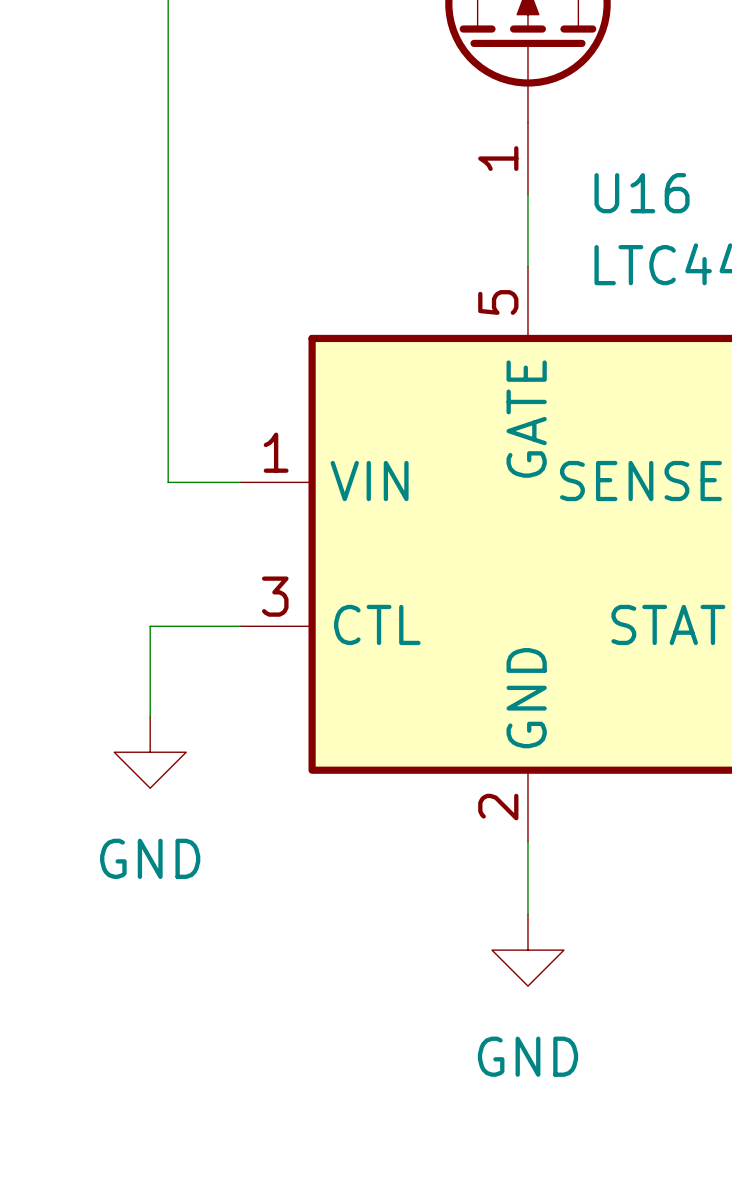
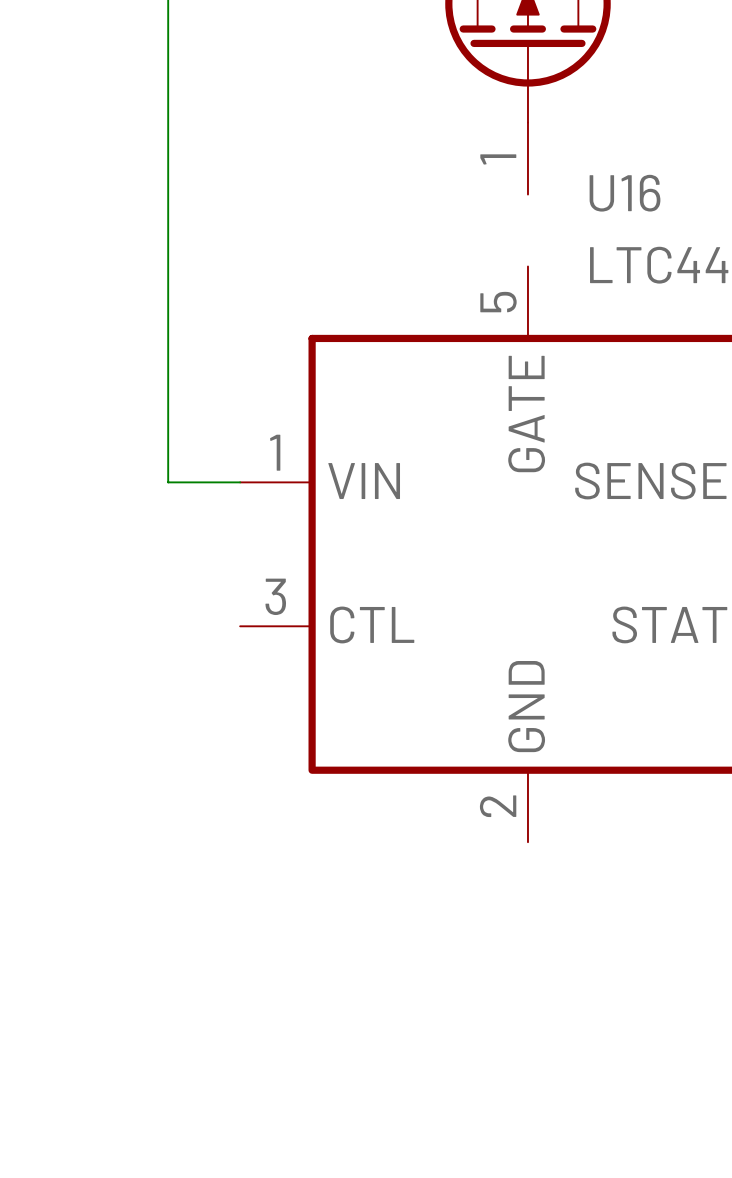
wire: (527, 194) (527, 266) -> none
wire: (240, 626) (150, 626) (150, 716) -> none
power symbol: GND (150, 752) -> none
wire: (527, 842) (527, 914) -> none
power symbol: GND (527, 950) -> none

